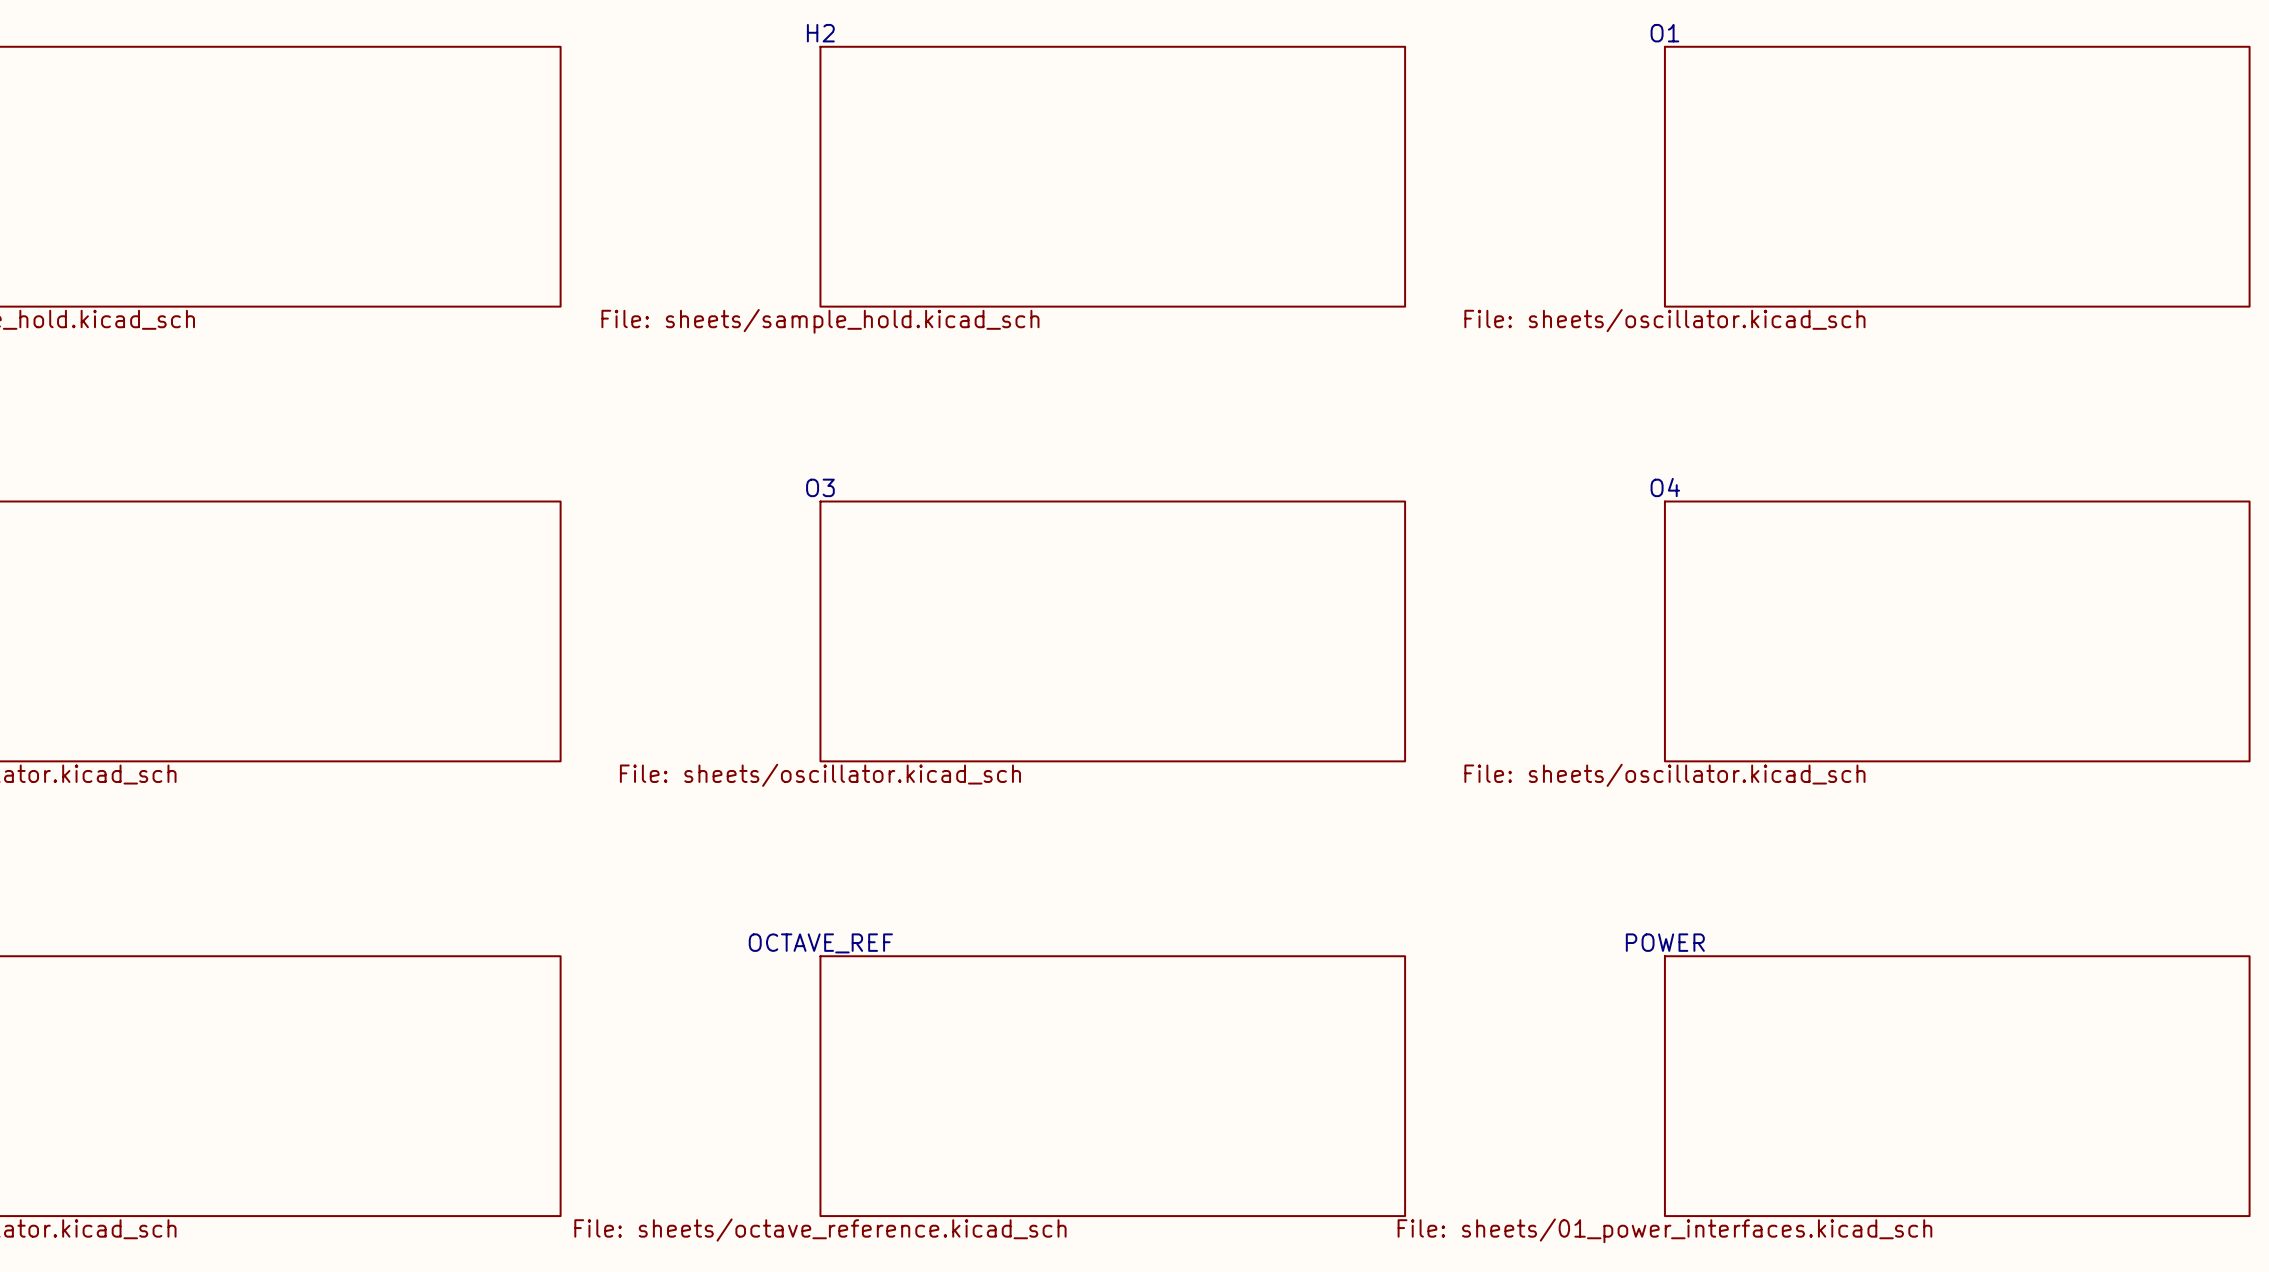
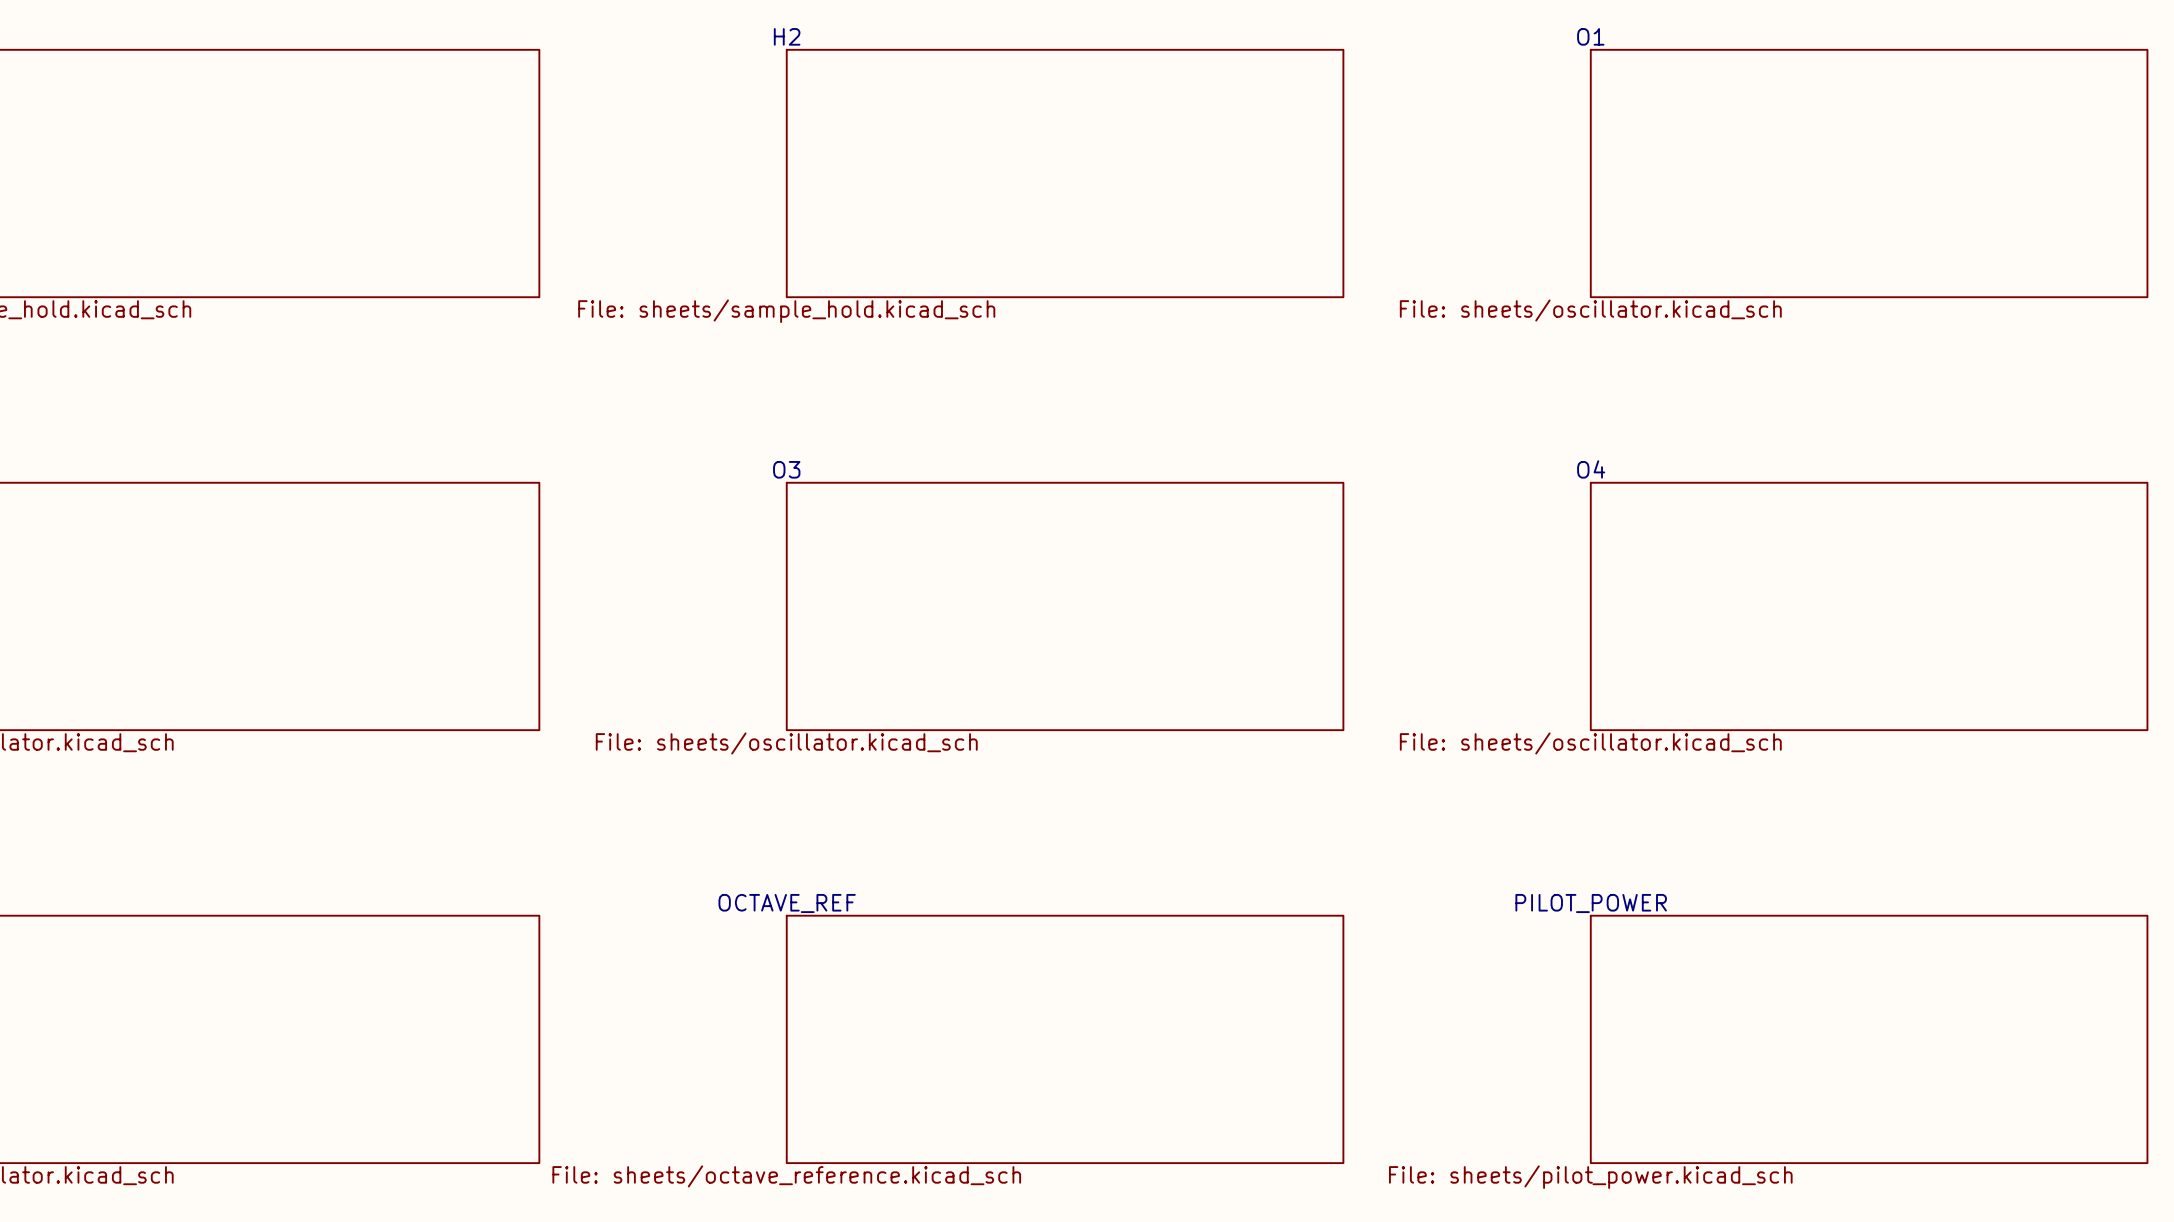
sheet POWER name: POWER (1665, 942) -> PILOT_POWER (1591, 903)
sheet POWER value: File: sheets/01_power_interfaces.kicad_sch (1664, 1230) -> File: sheets/pilot_power.kicad_sch (1590, 1177)

